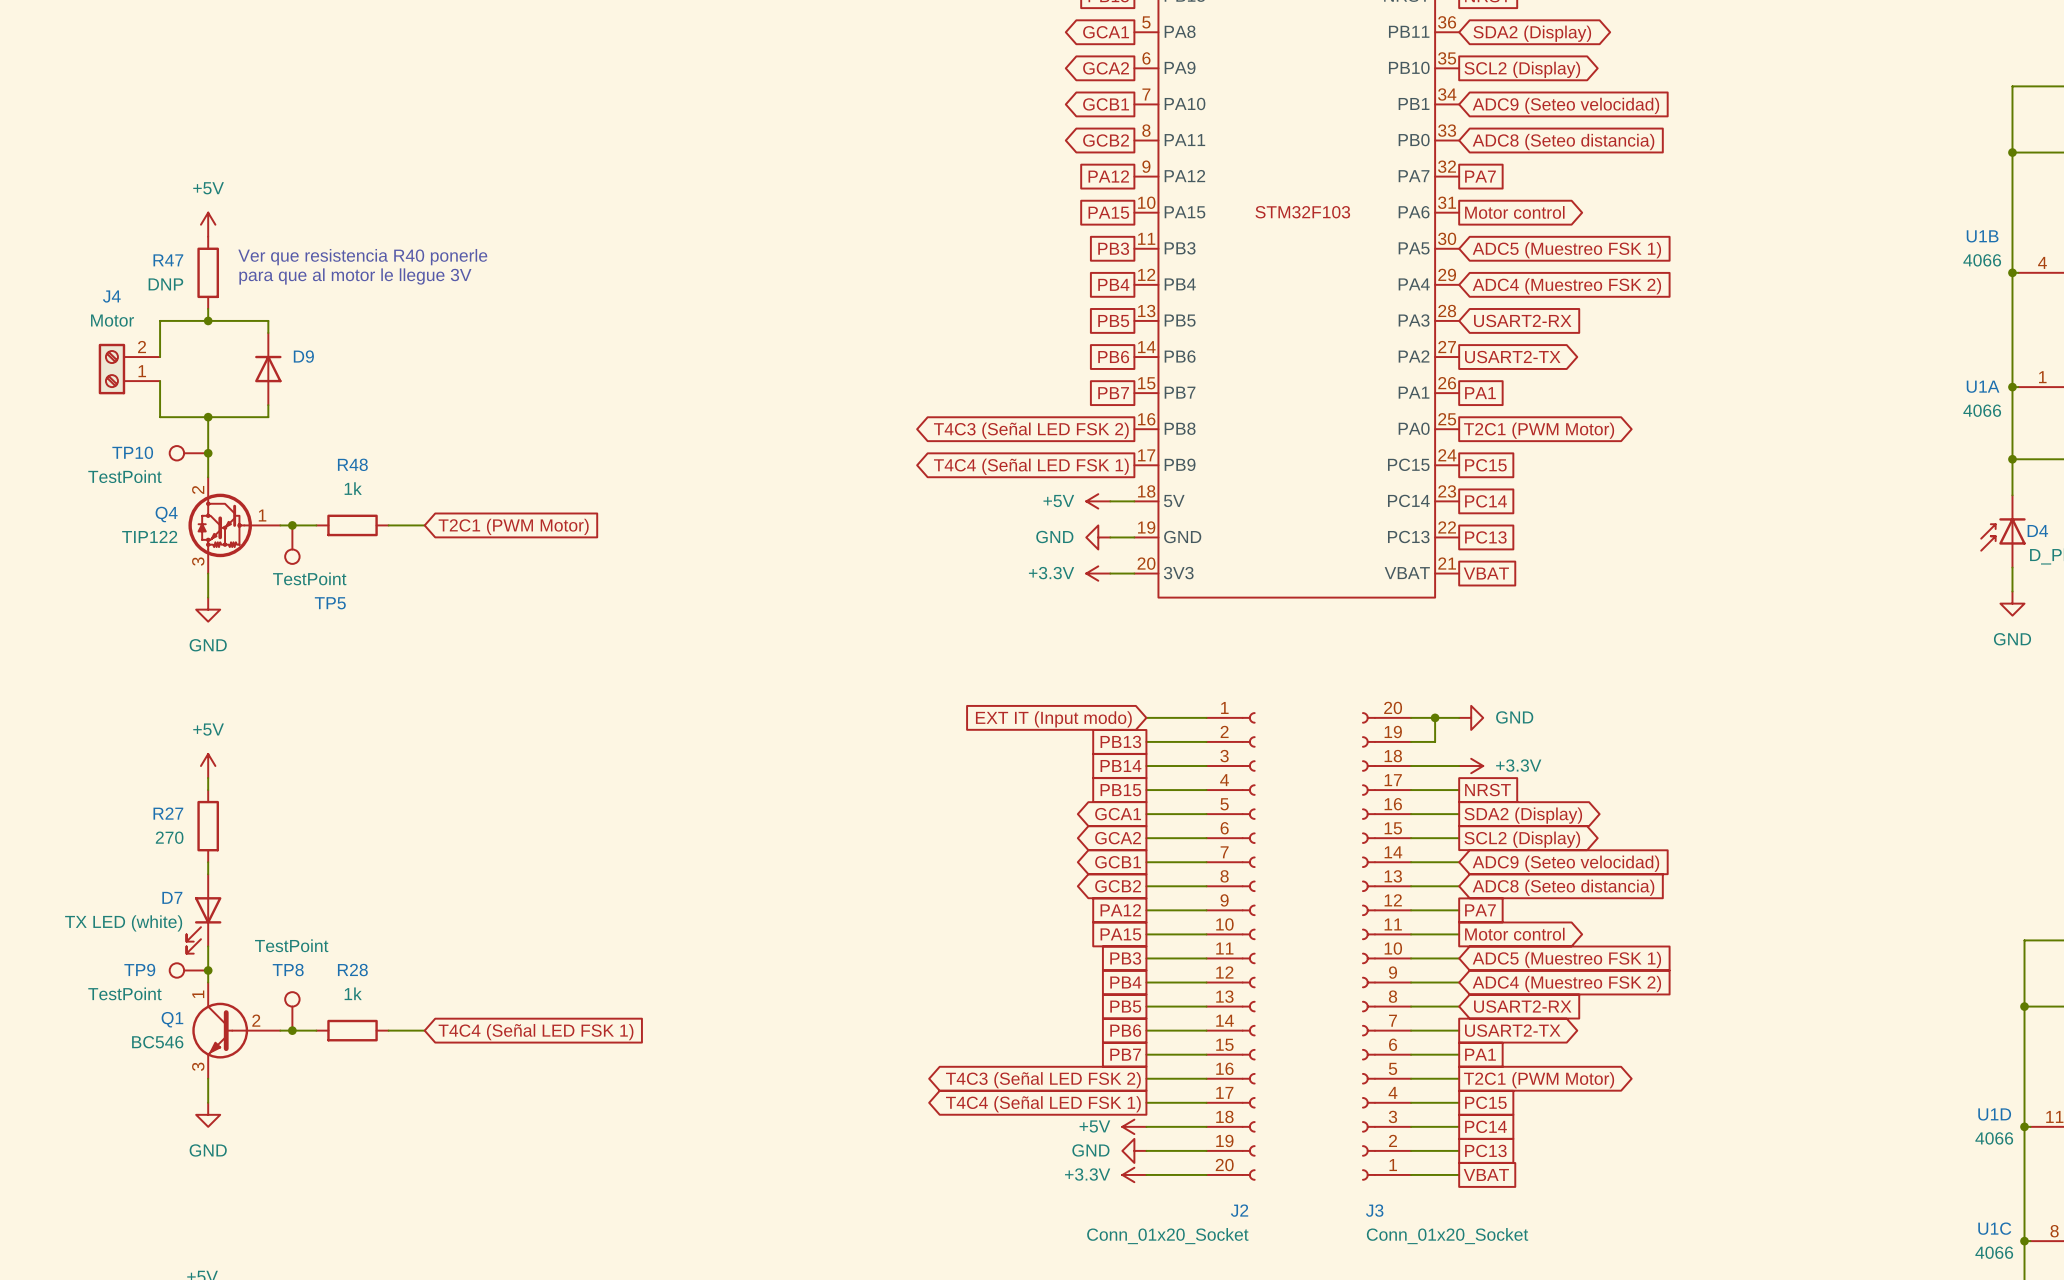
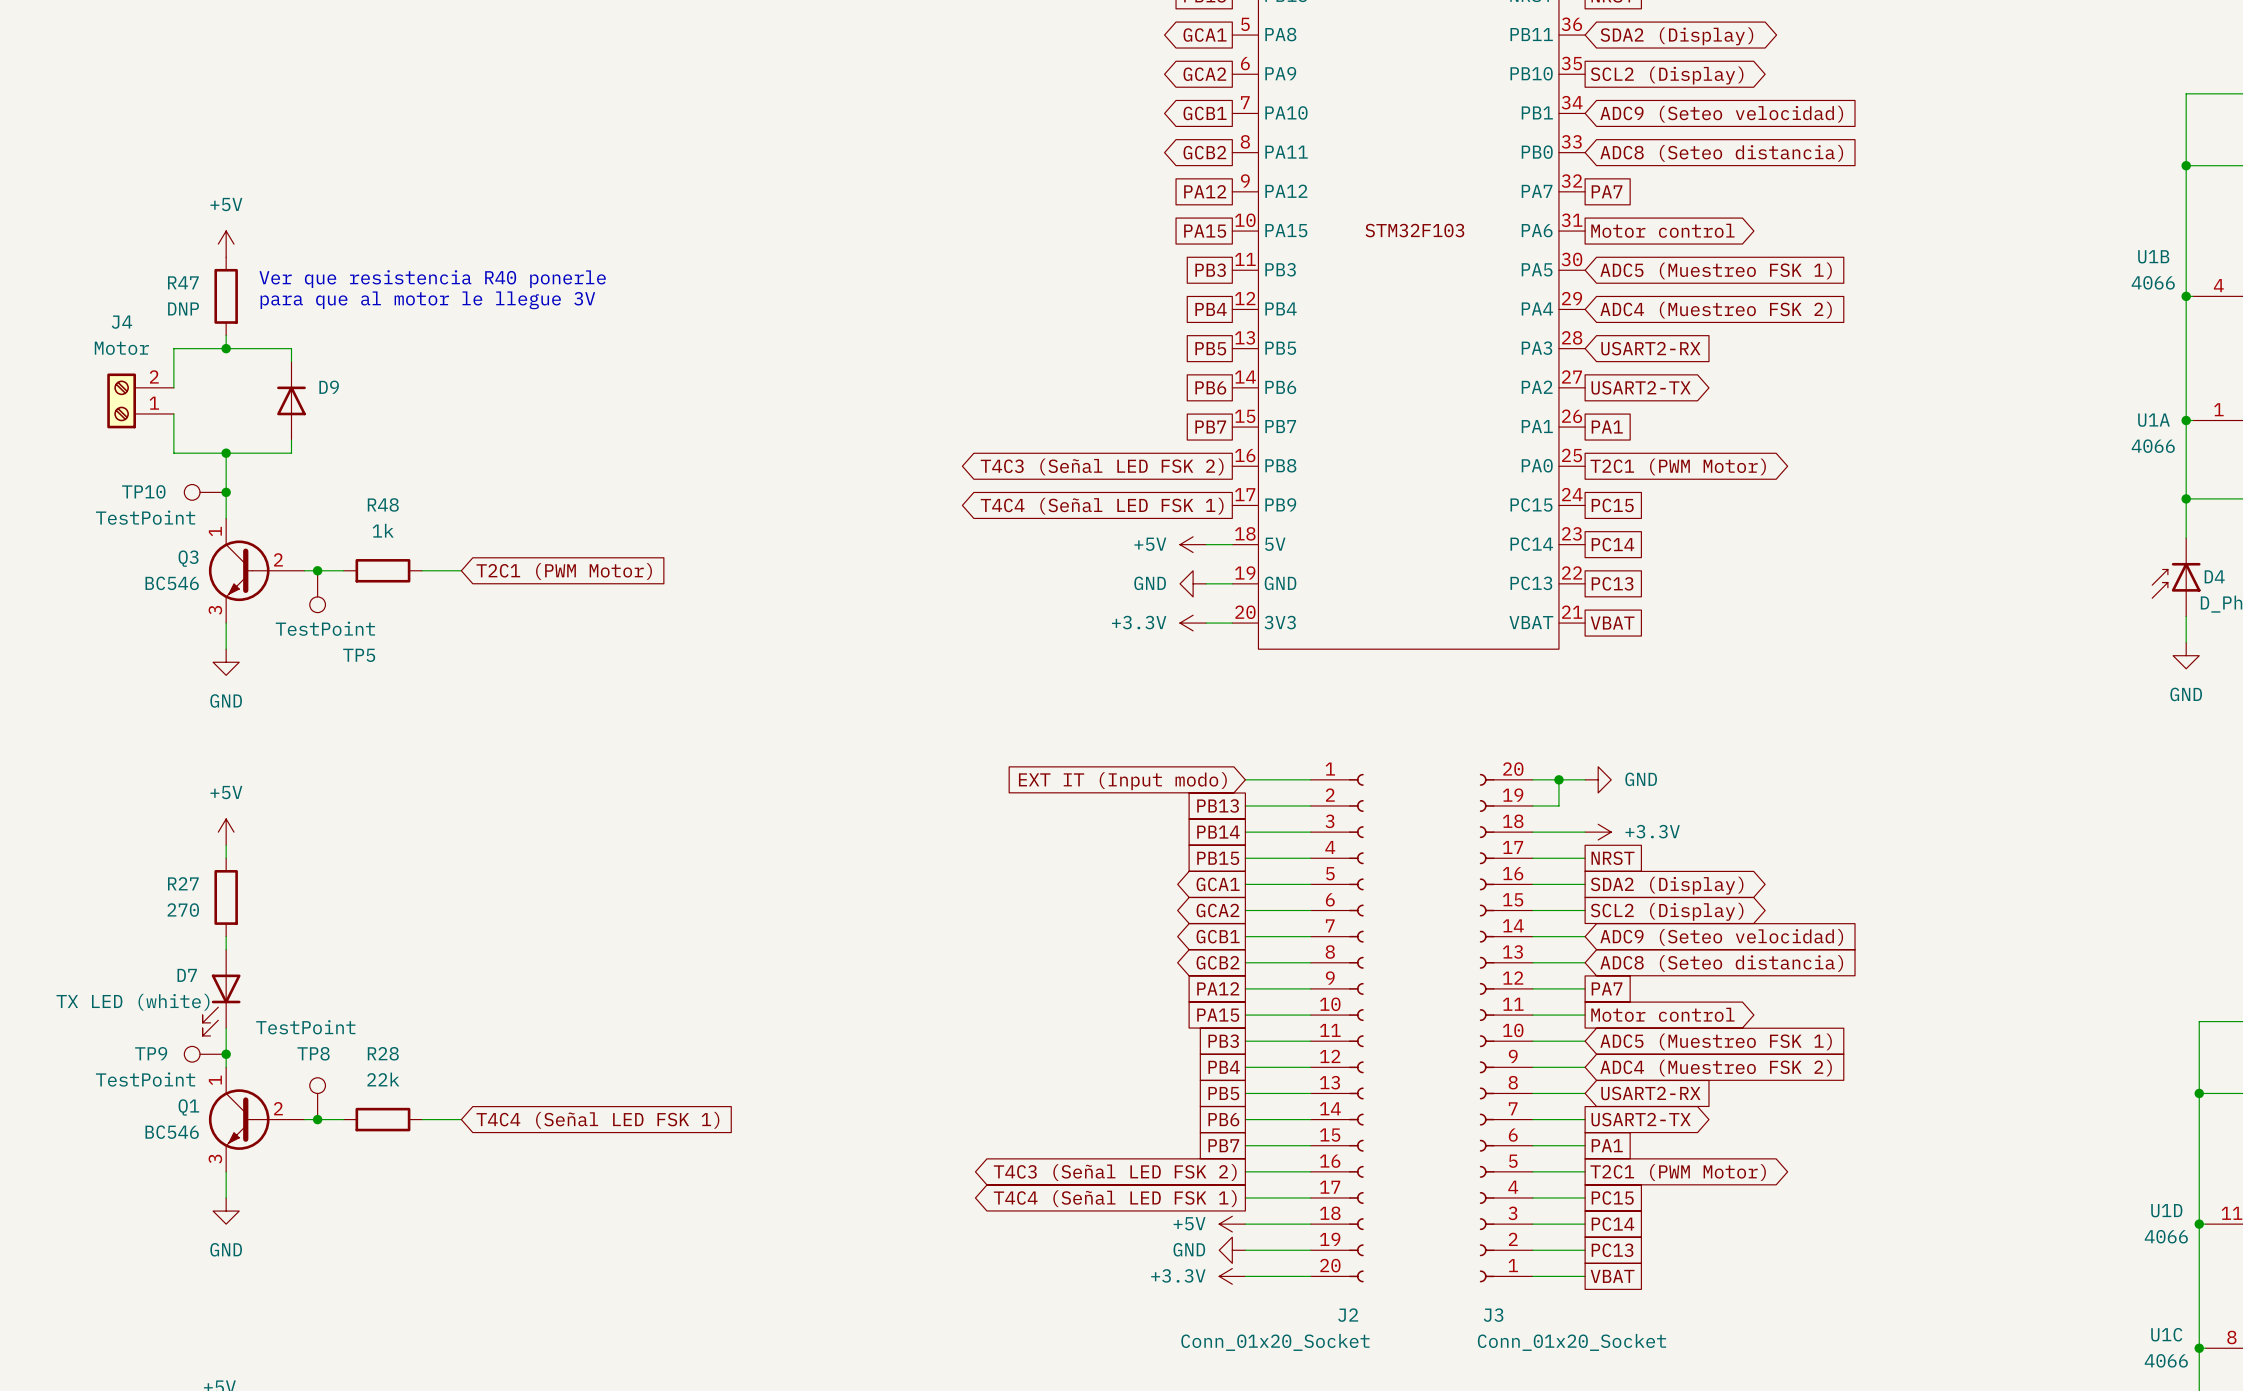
Q4: TIP122 (234, 525) -> none
Q3: none -> BC546 (256, 570)
R28 value: 1k (353, 993) -> 22k (383, 1079)

